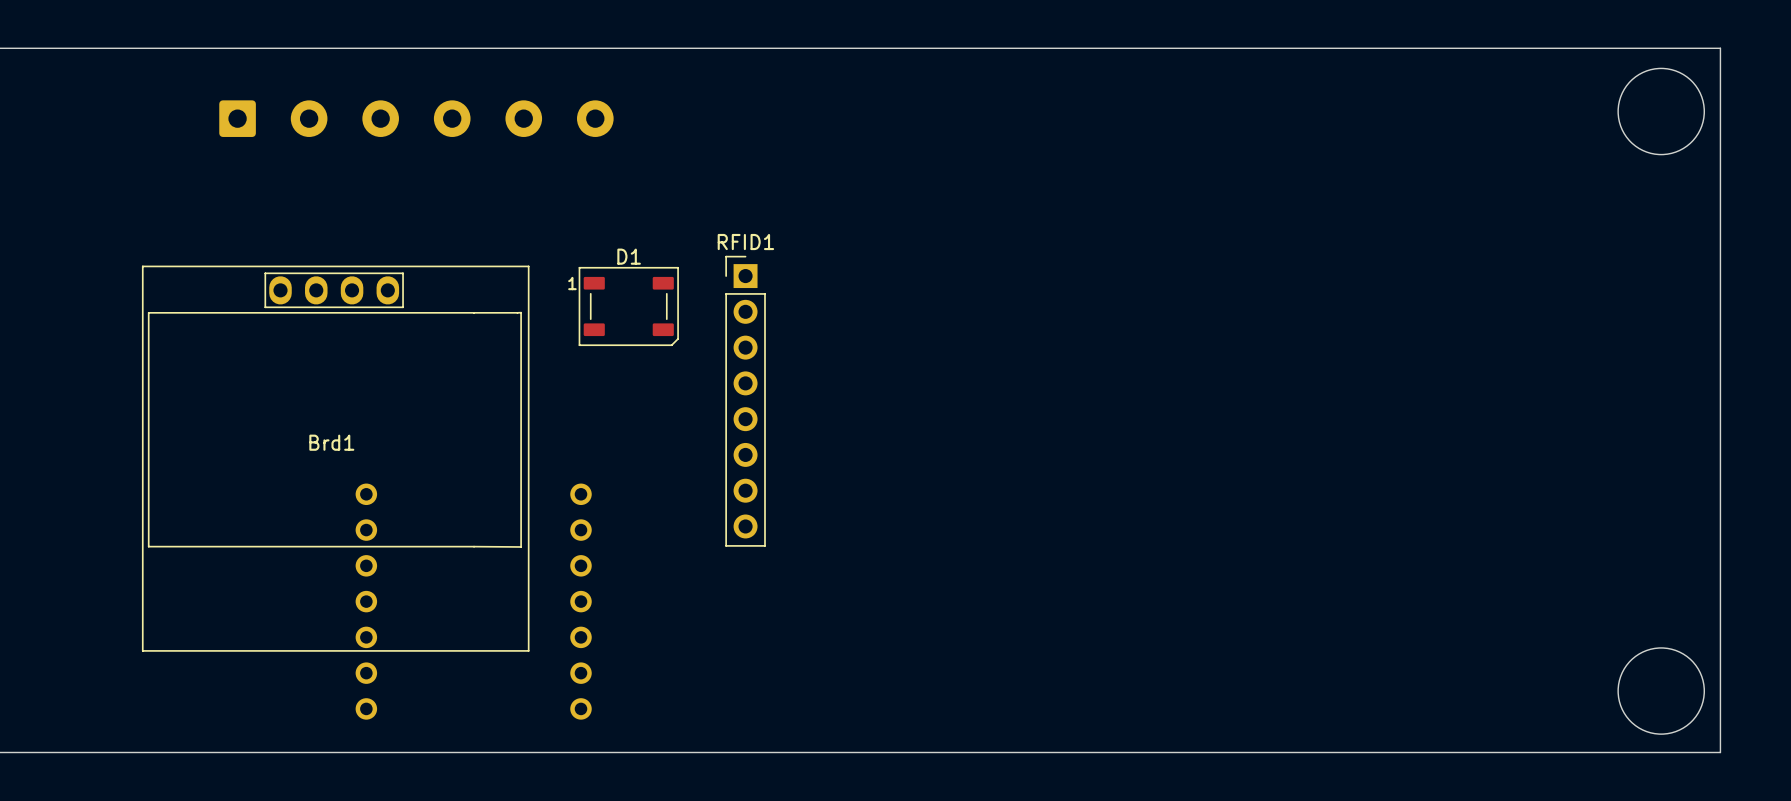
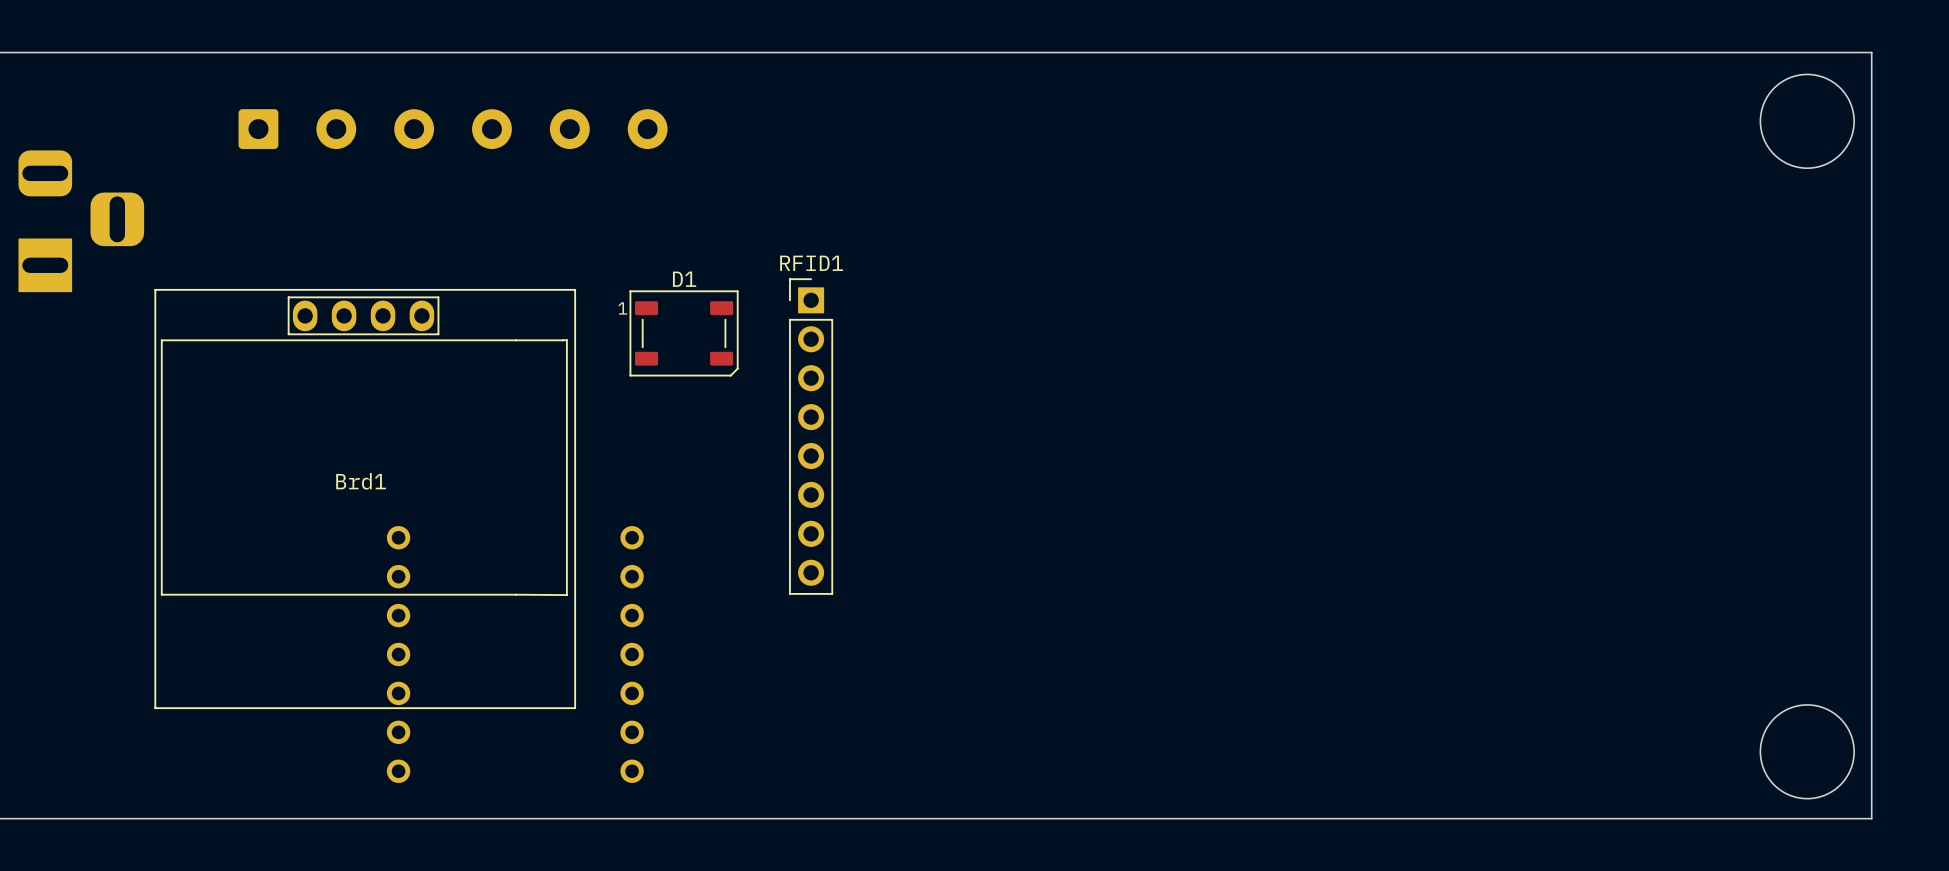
part: none -> (81, 221)

